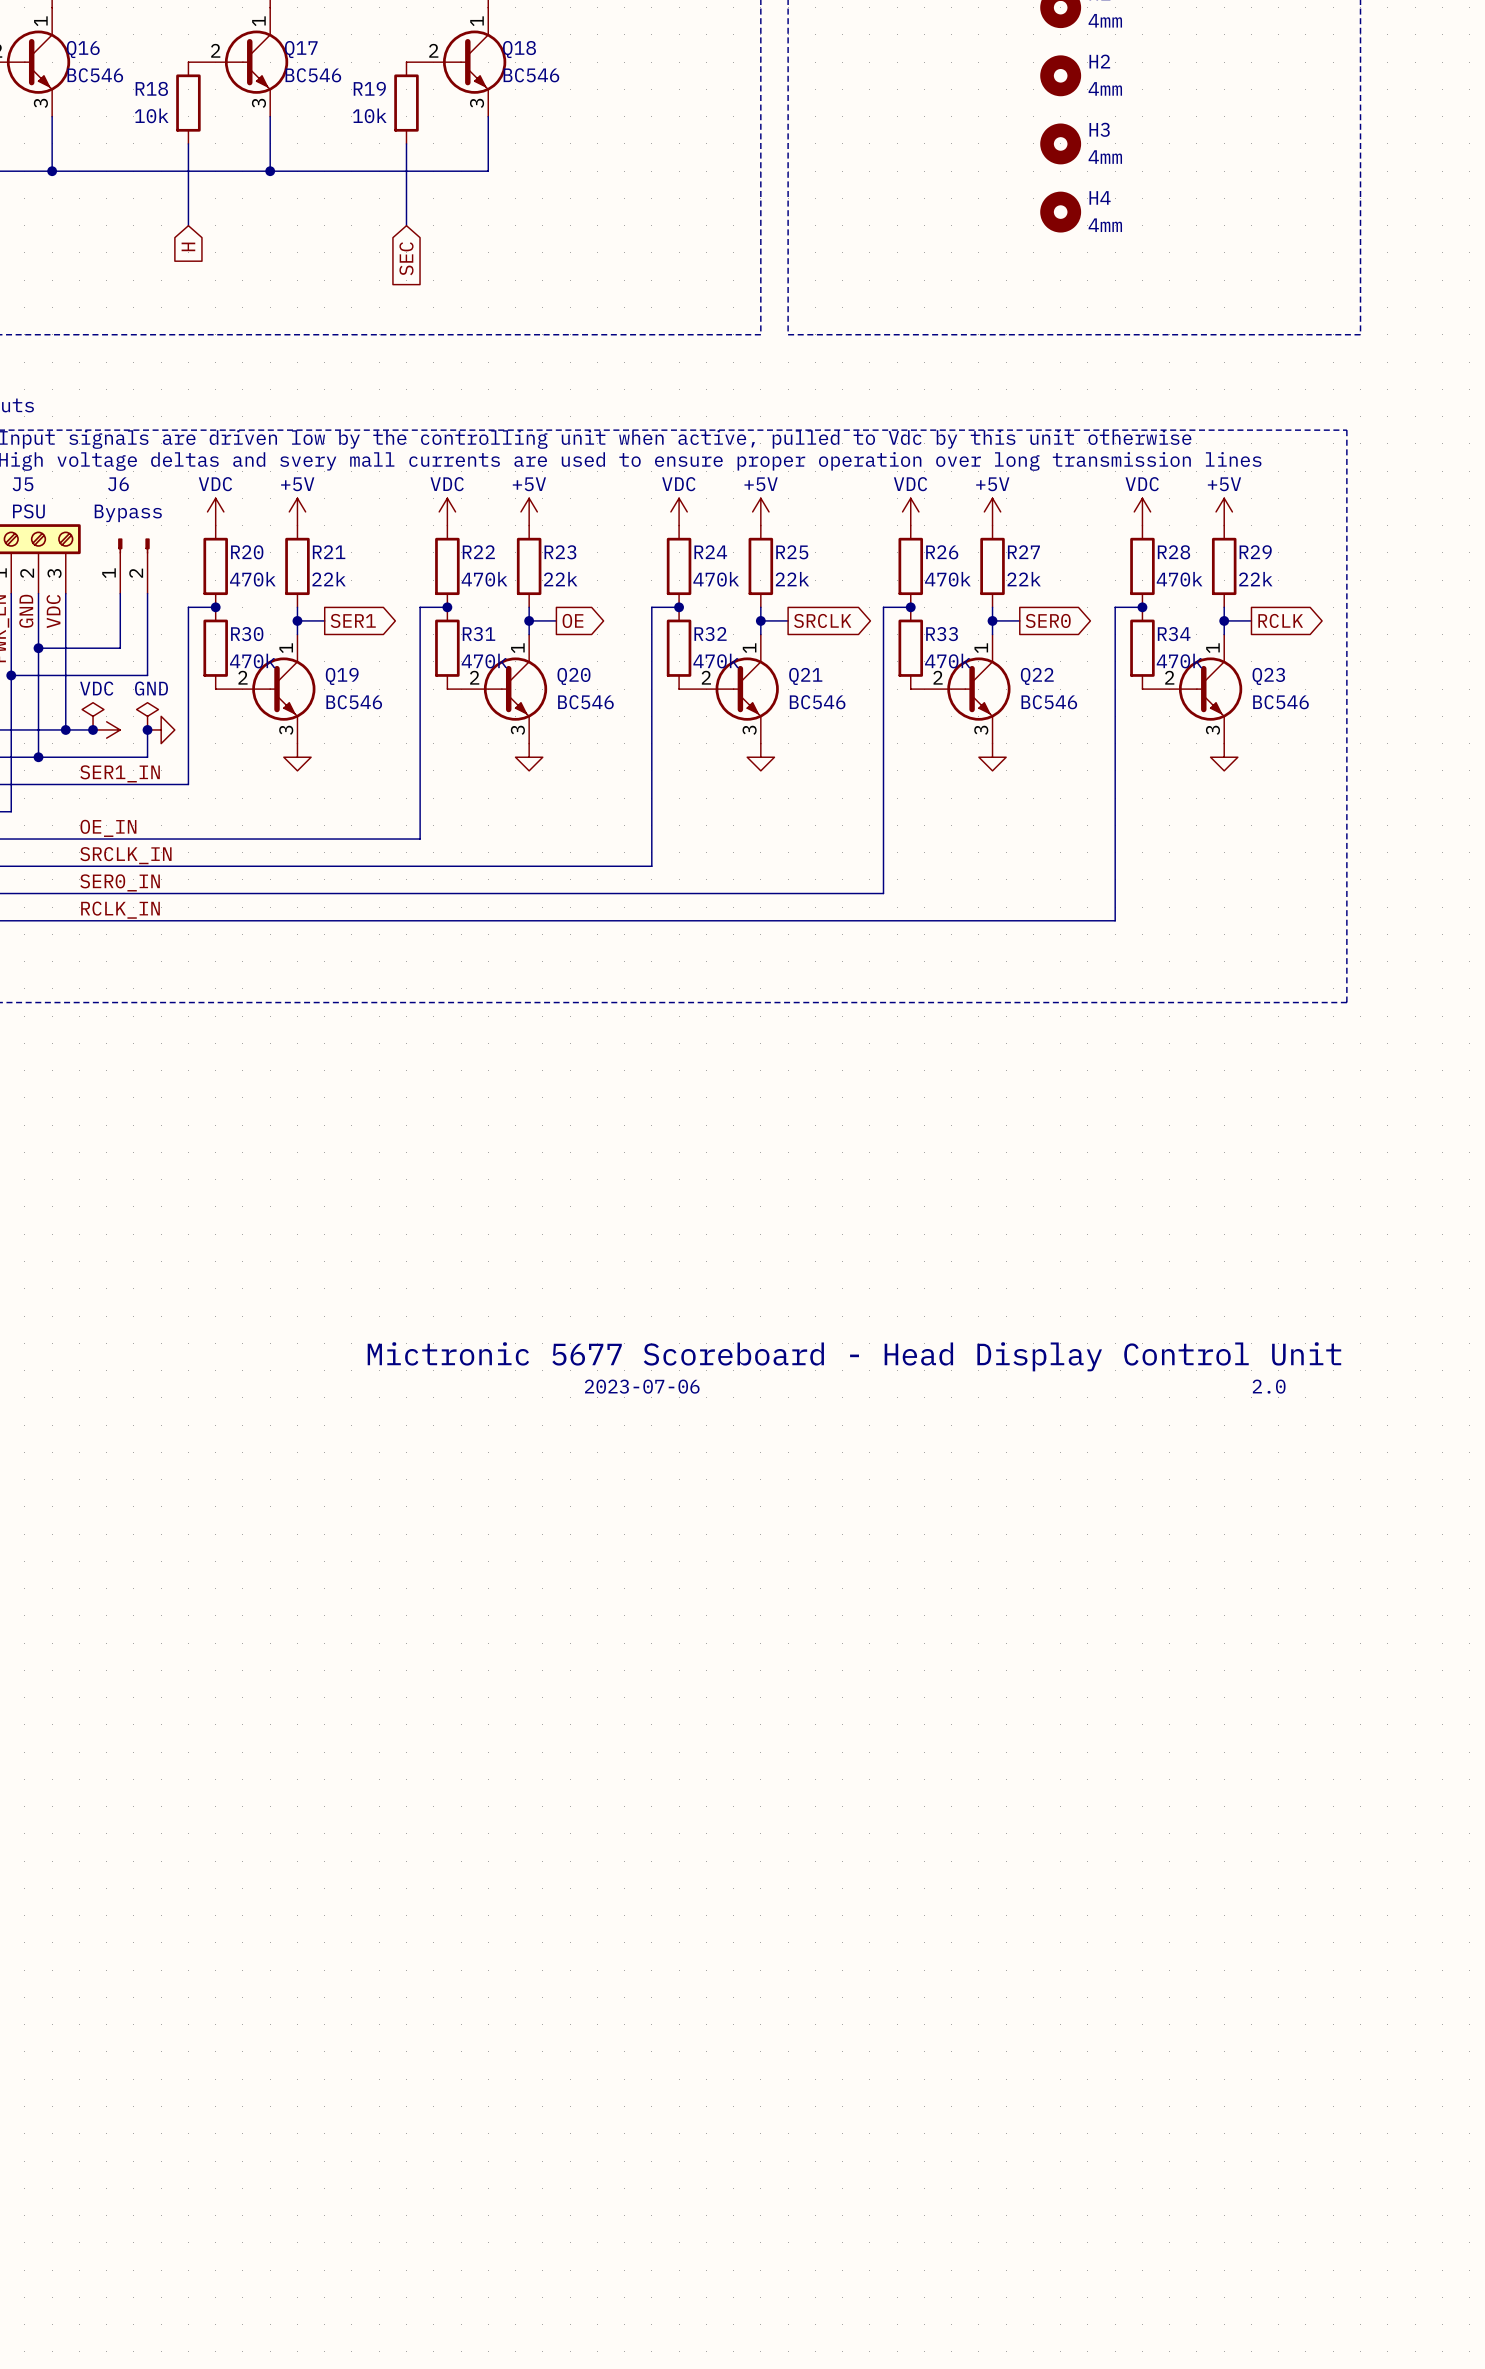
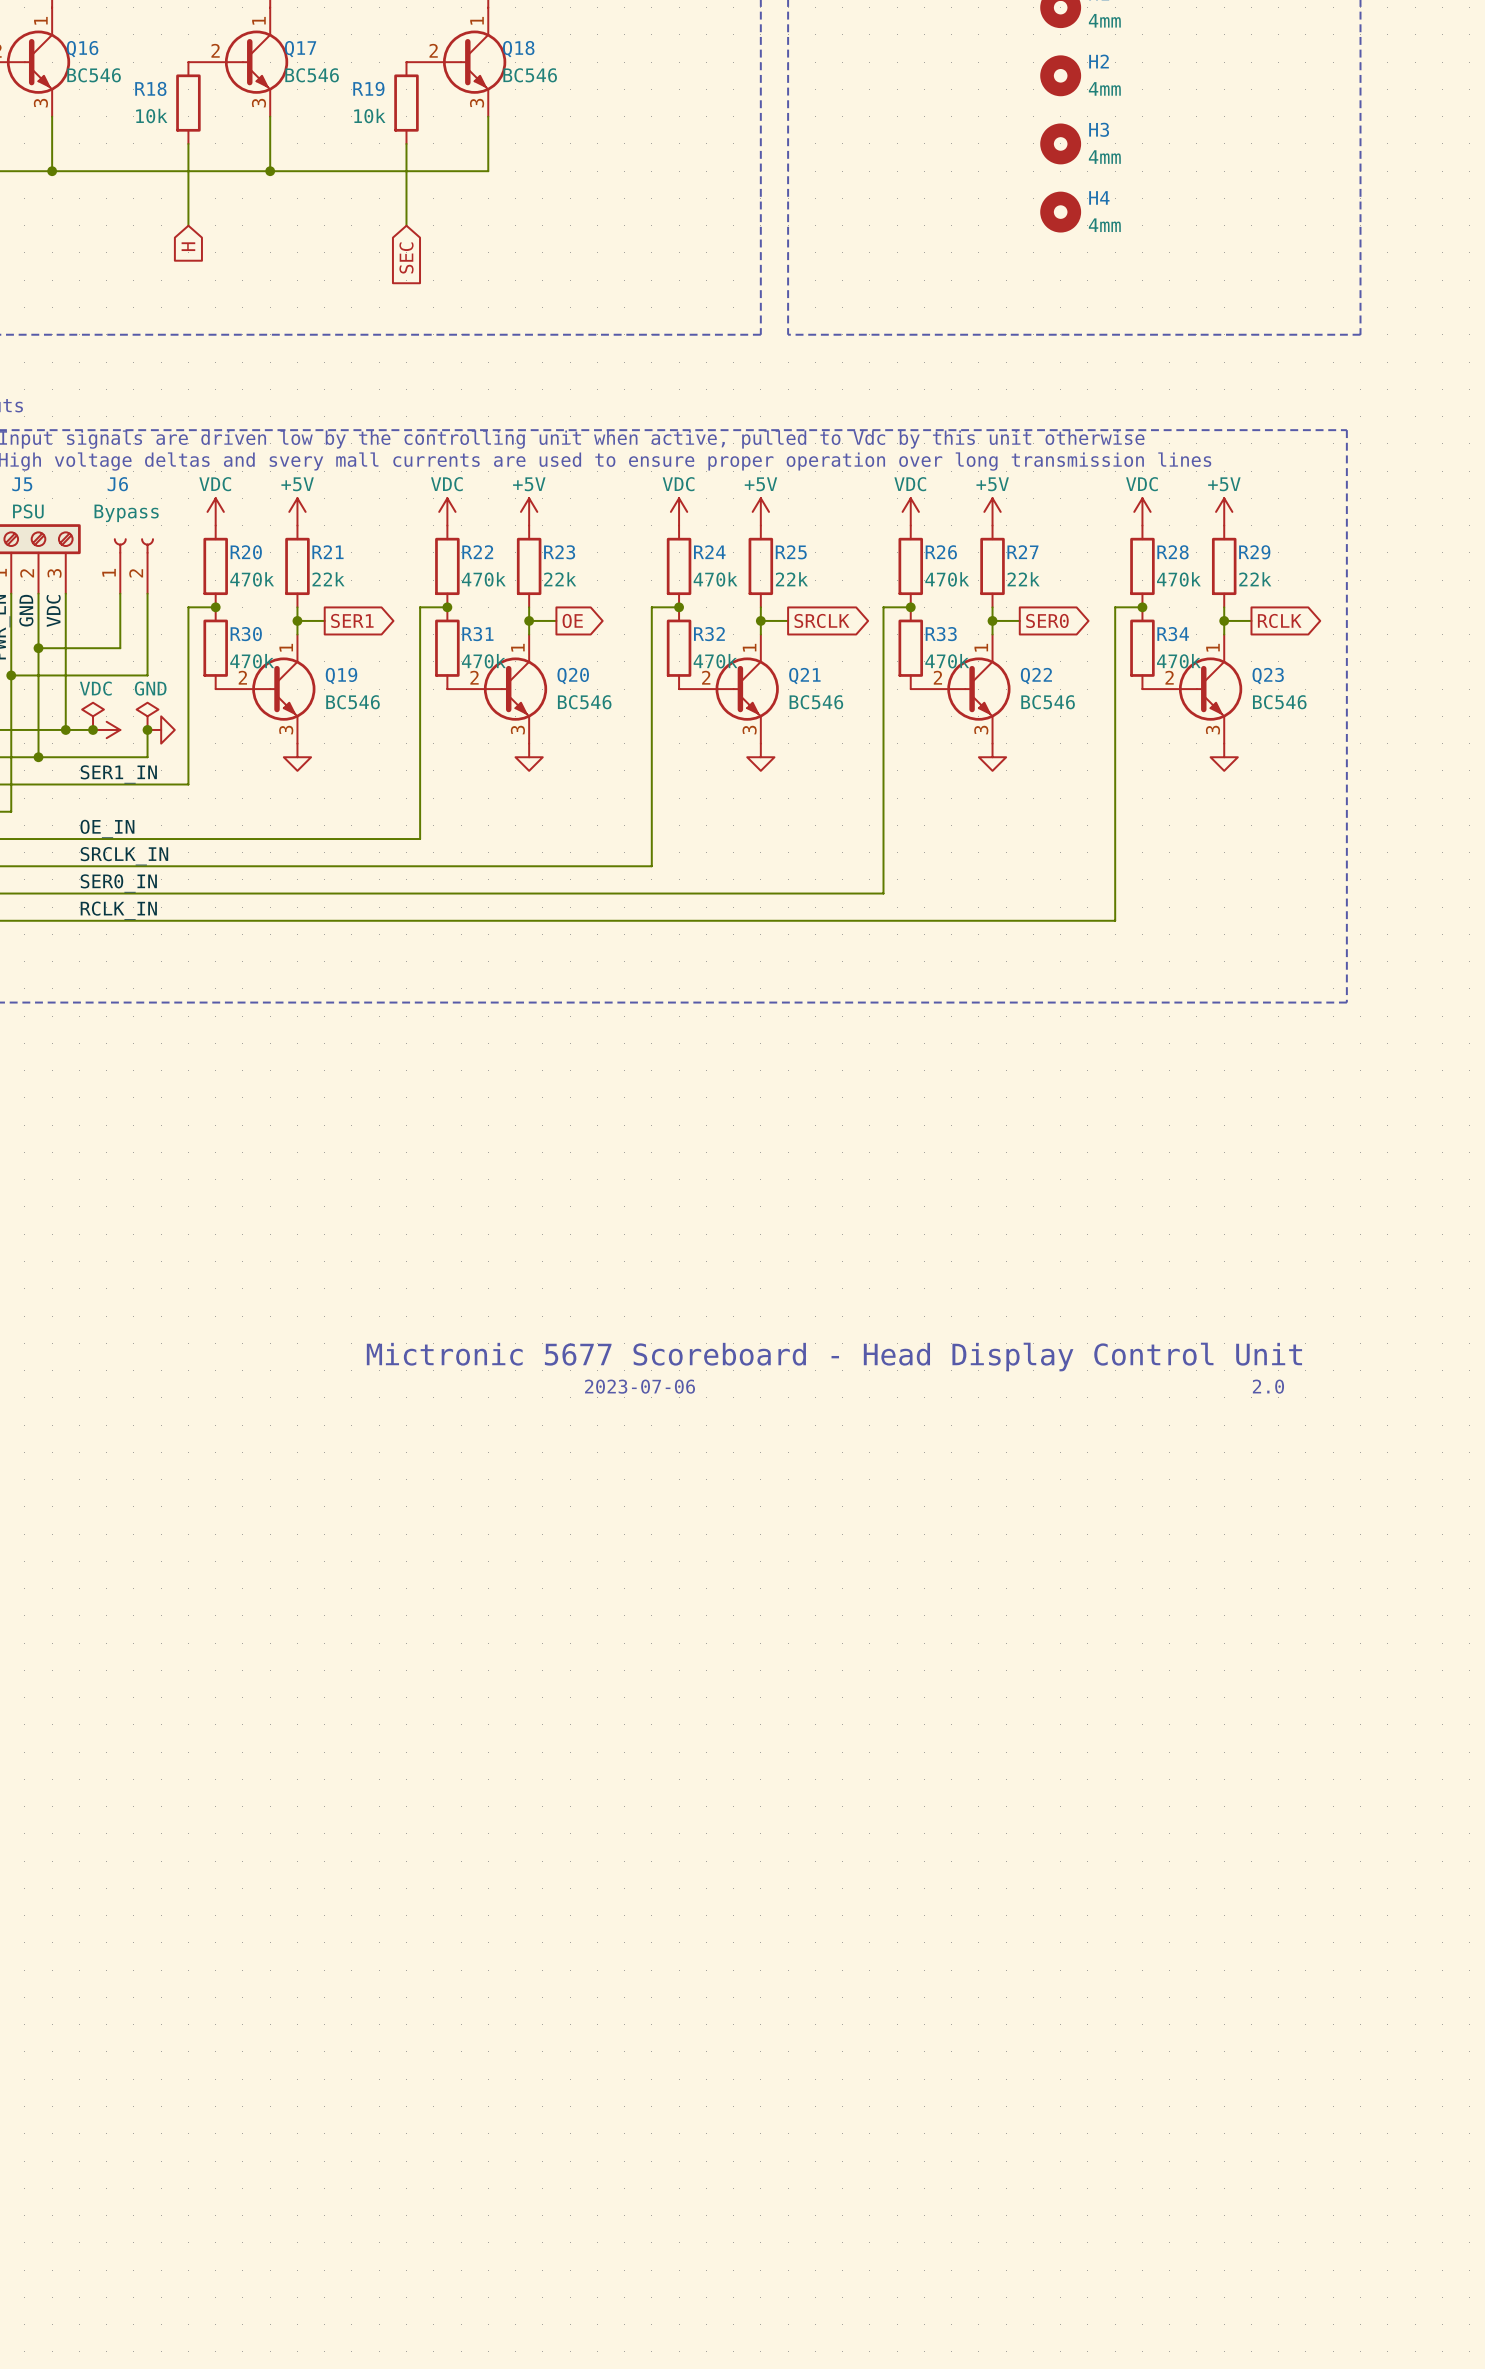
J6 symbol: [118, 538, 150, 594] -> [114, 538, 154, 594]

